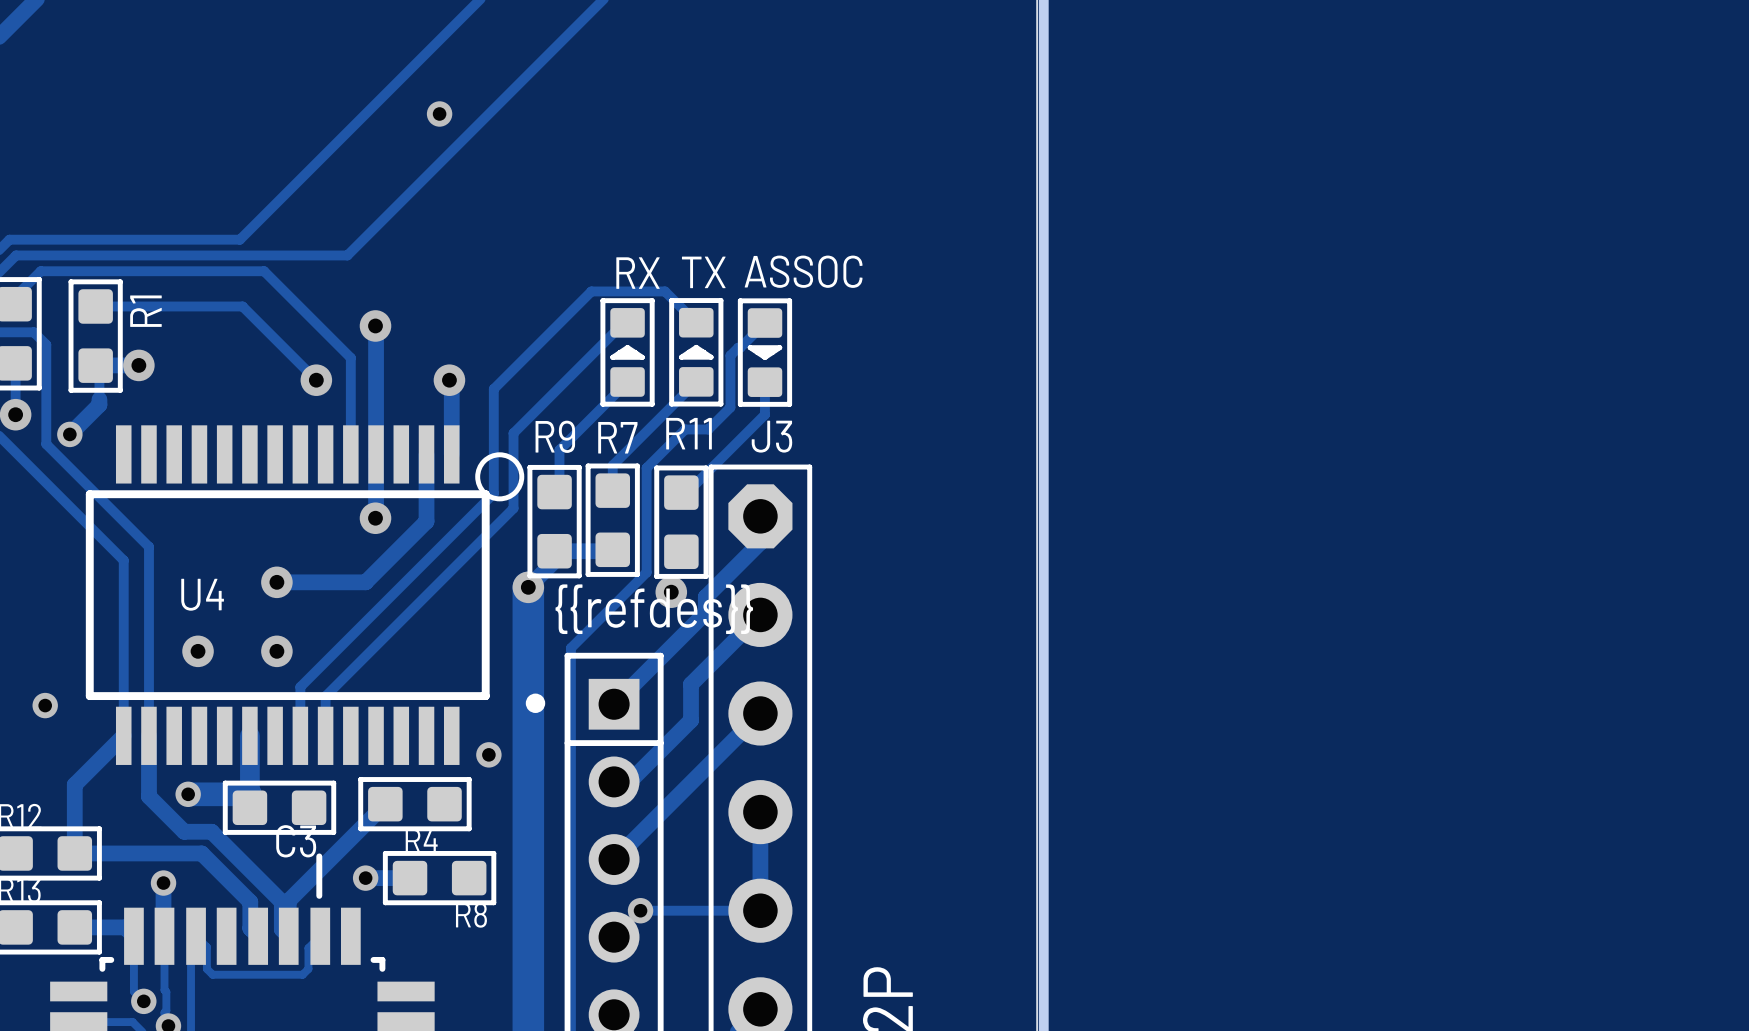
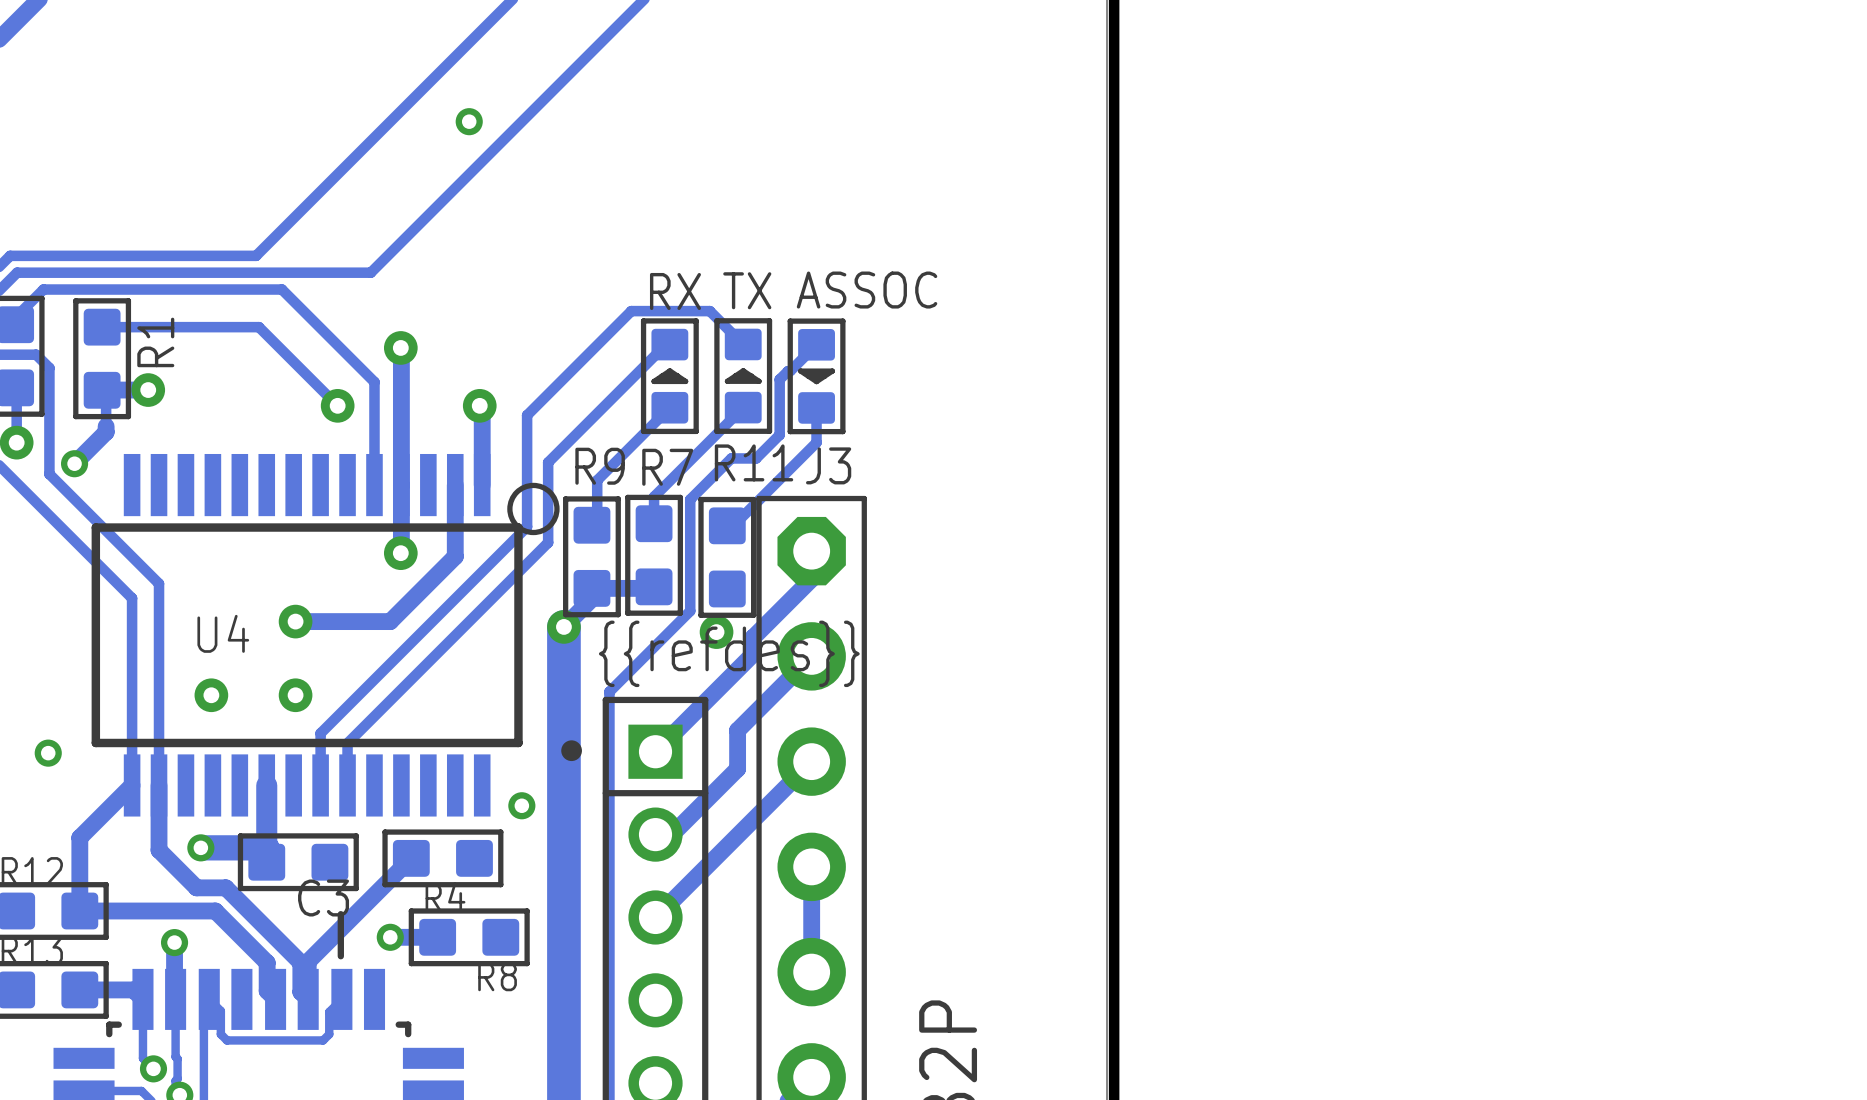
via: (640, 910) -> none
track: (760, 910) (640, 910) -> none

